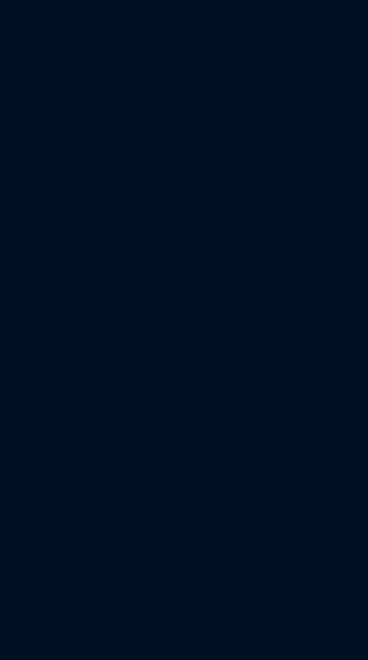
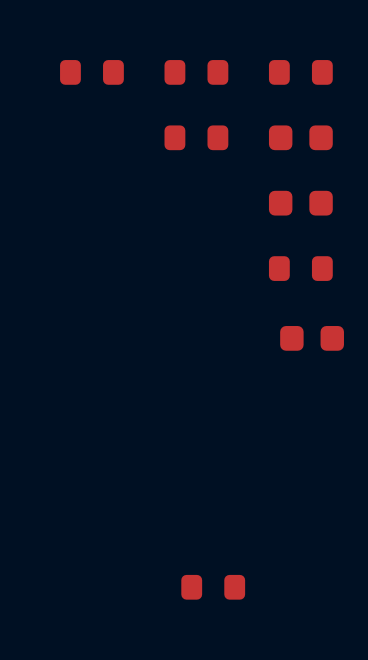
part: none -> (91, 72)
part: none -> (196, 72)
part: none -> (300, 72)
part: none -> (196, 137)
part: none -> (300, 137)
part: none -> (300, 203)
part: none -> (300, 268)
part: none -> (312, 338)
part: none -> (213, 587)

